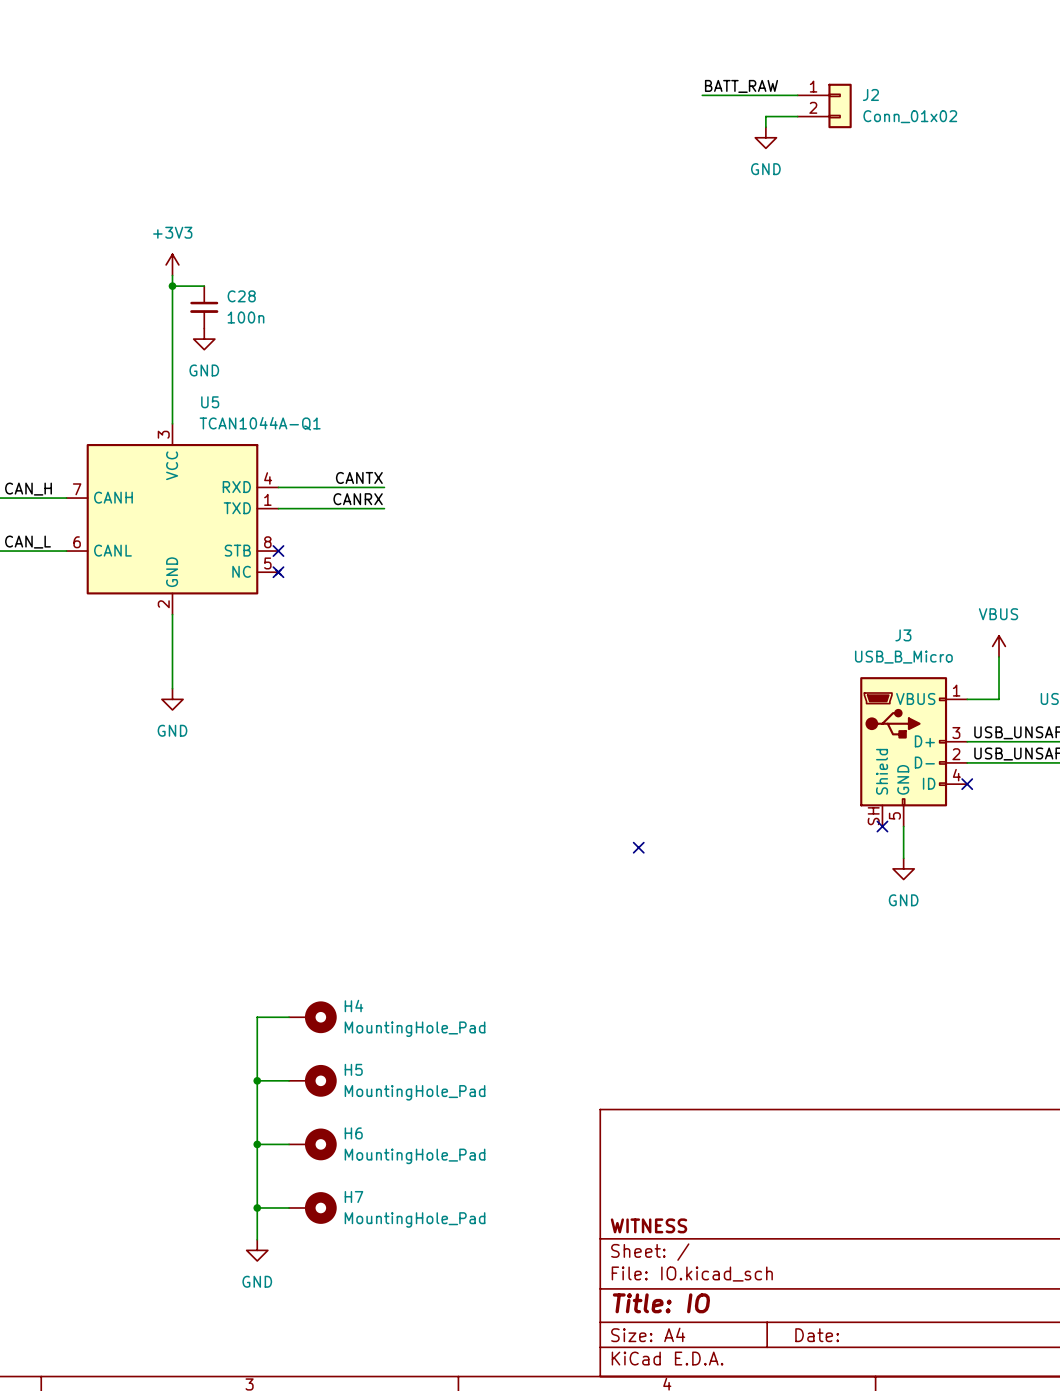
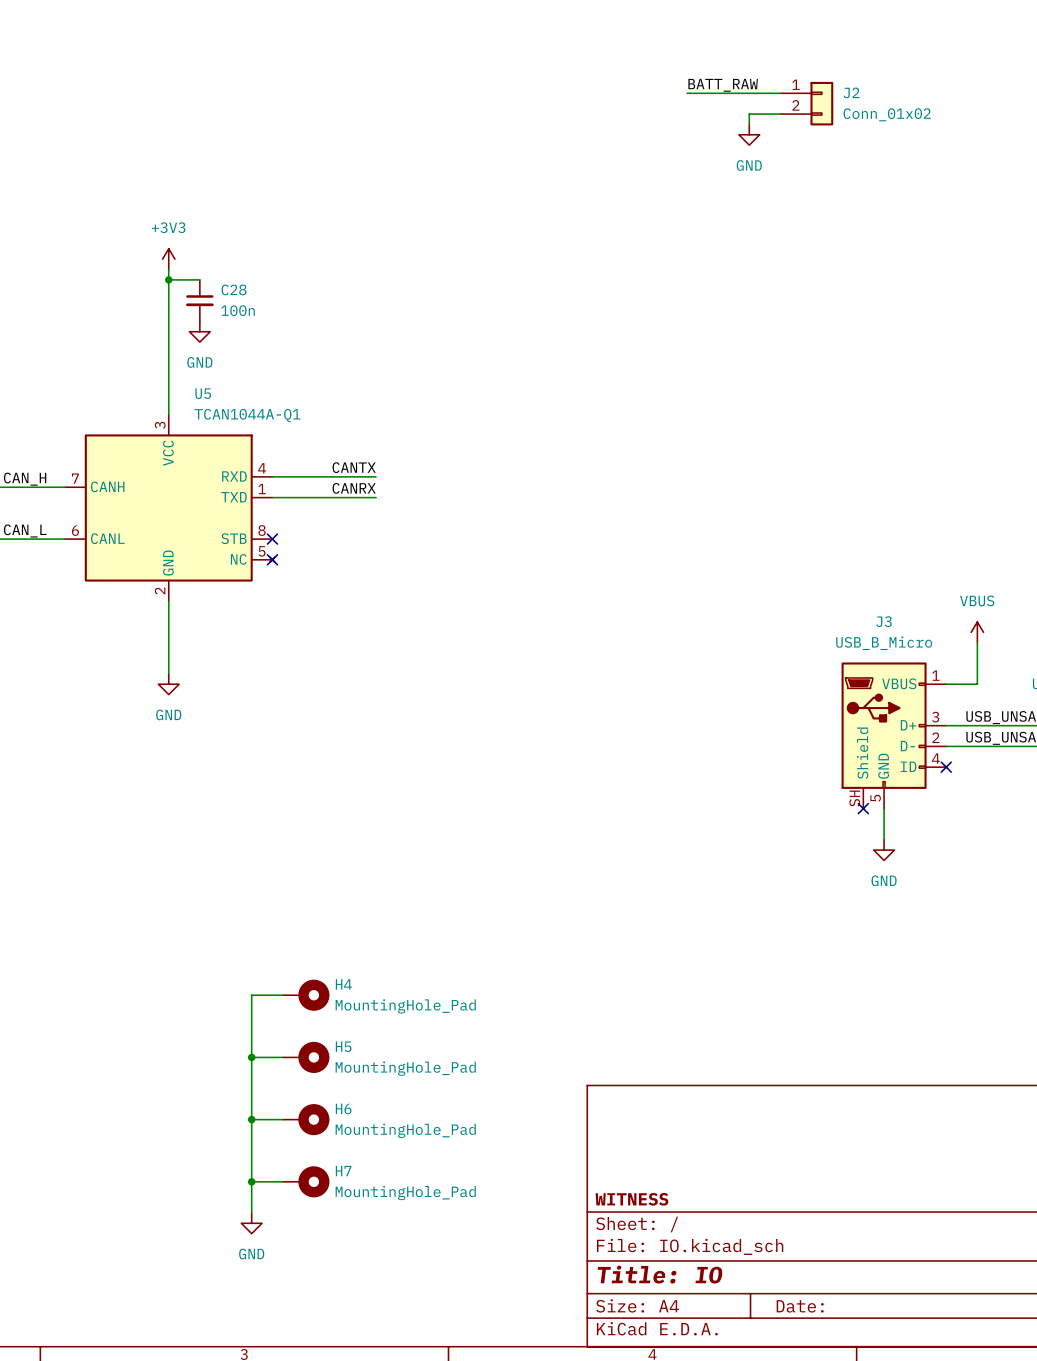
no-connect mark: (638, 847) -> none

